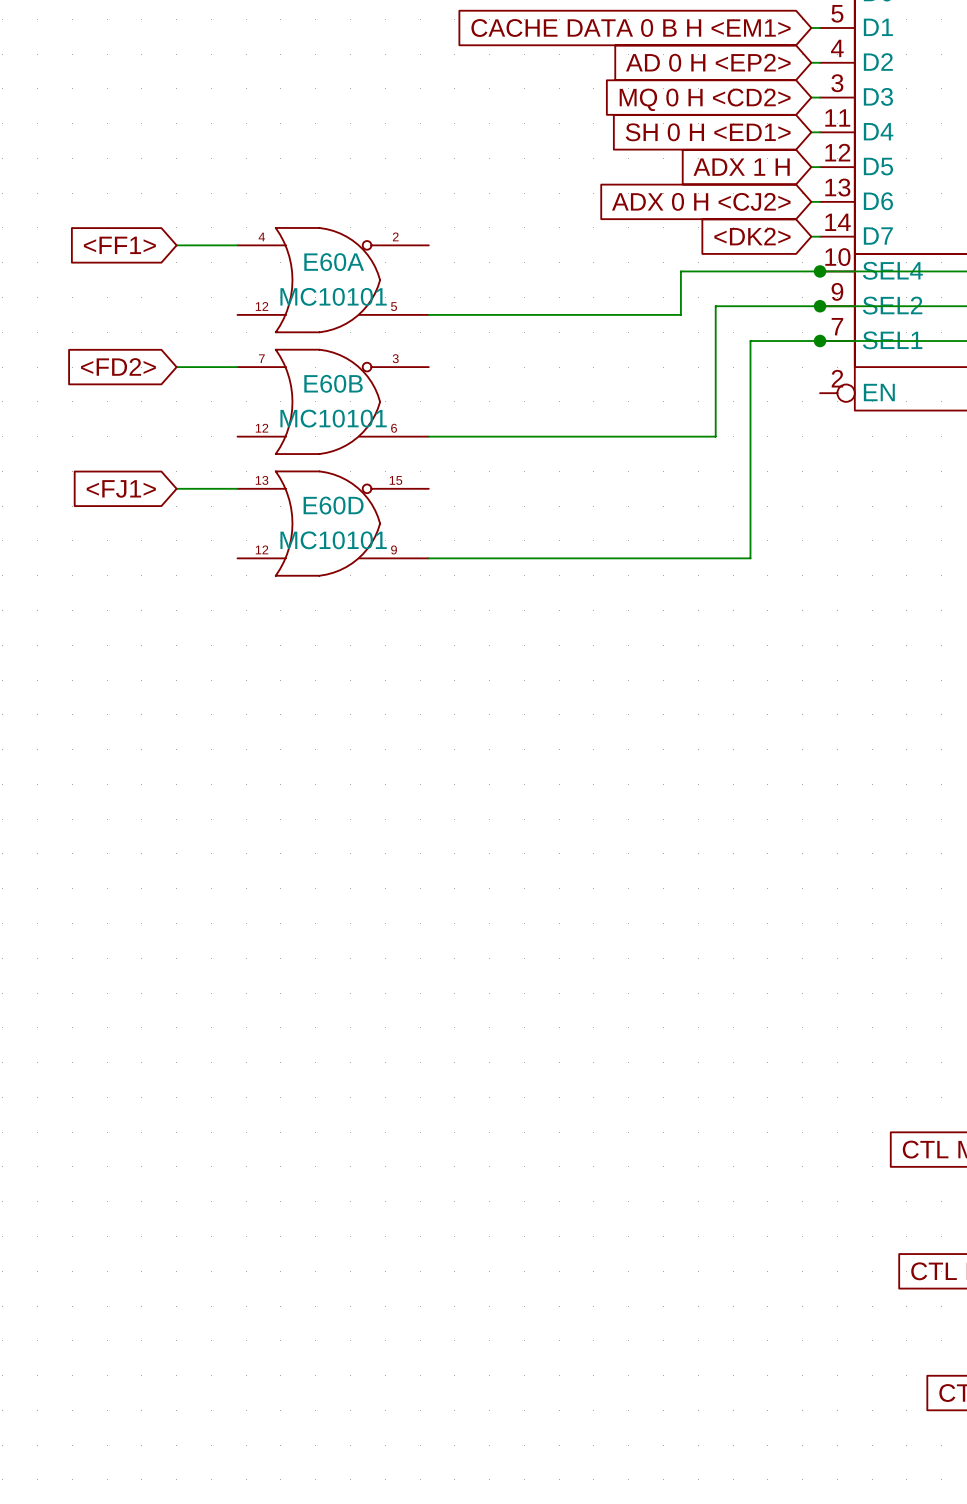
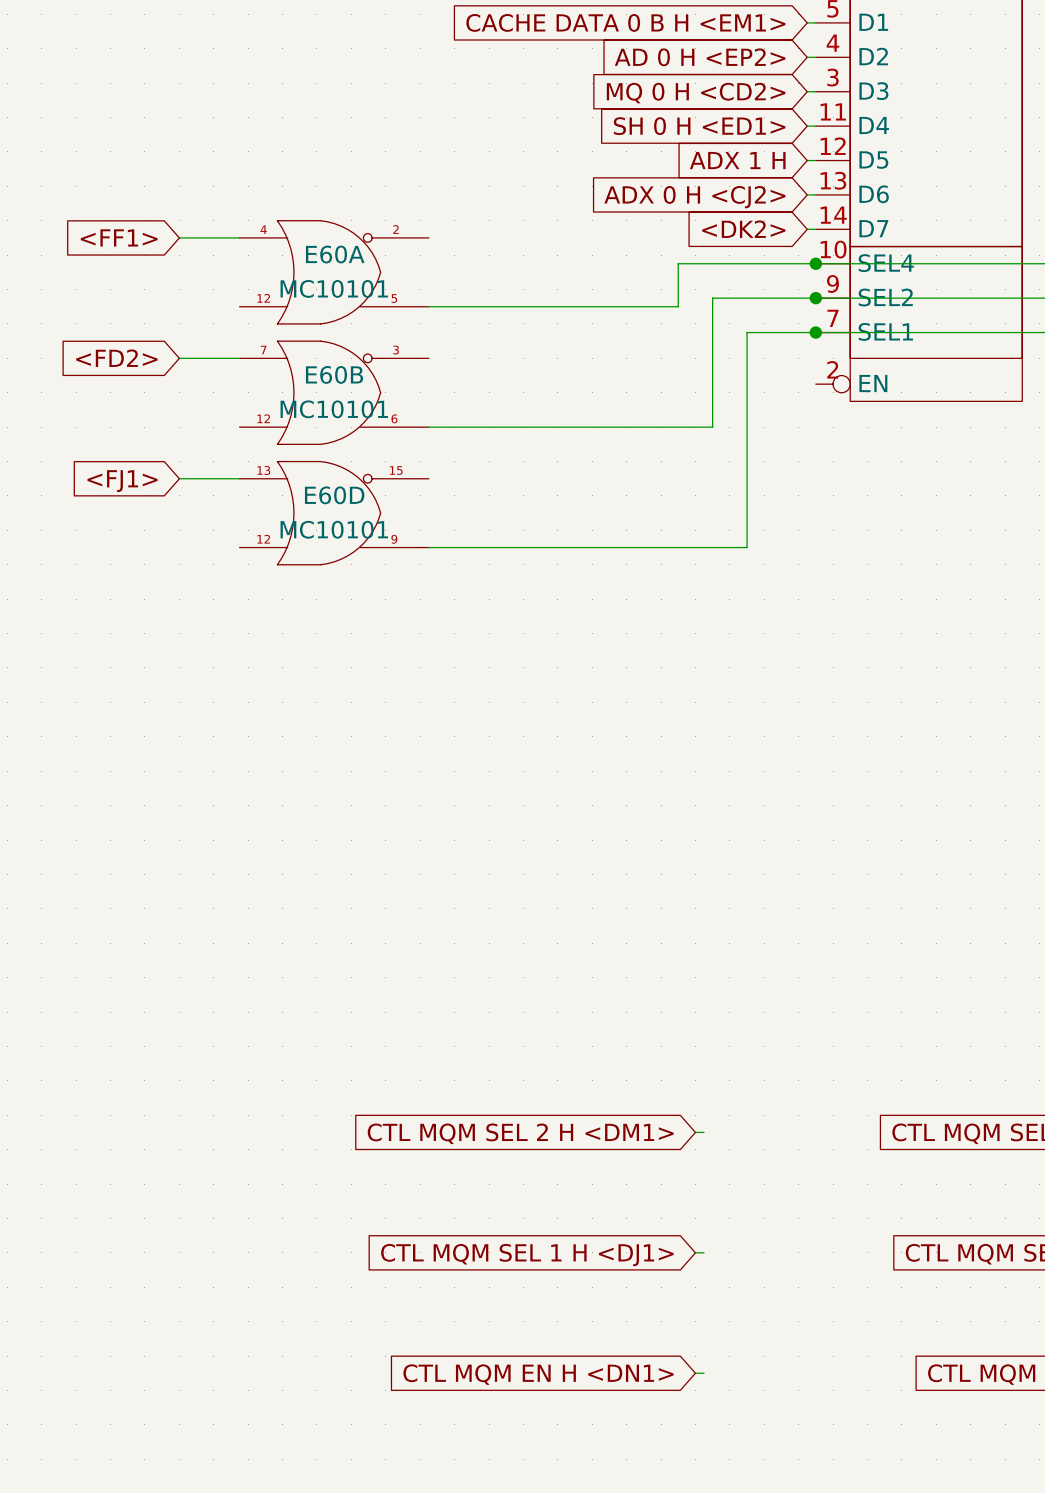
wire: none -> (695, 1132) (704, 1132)
global label: none -> CTL MQM SEL 2 H <DM1> (520, 1133)
wire: none -> (695, 1252) (704, 1252)
global label: none -> CTL MQM SEL 1 H <DJ1> (527, 1255)
wire: none -> (695, 1373) (704, 1373)
global label: none -> CTL MQM EN H <DN1> (538, 1374)

